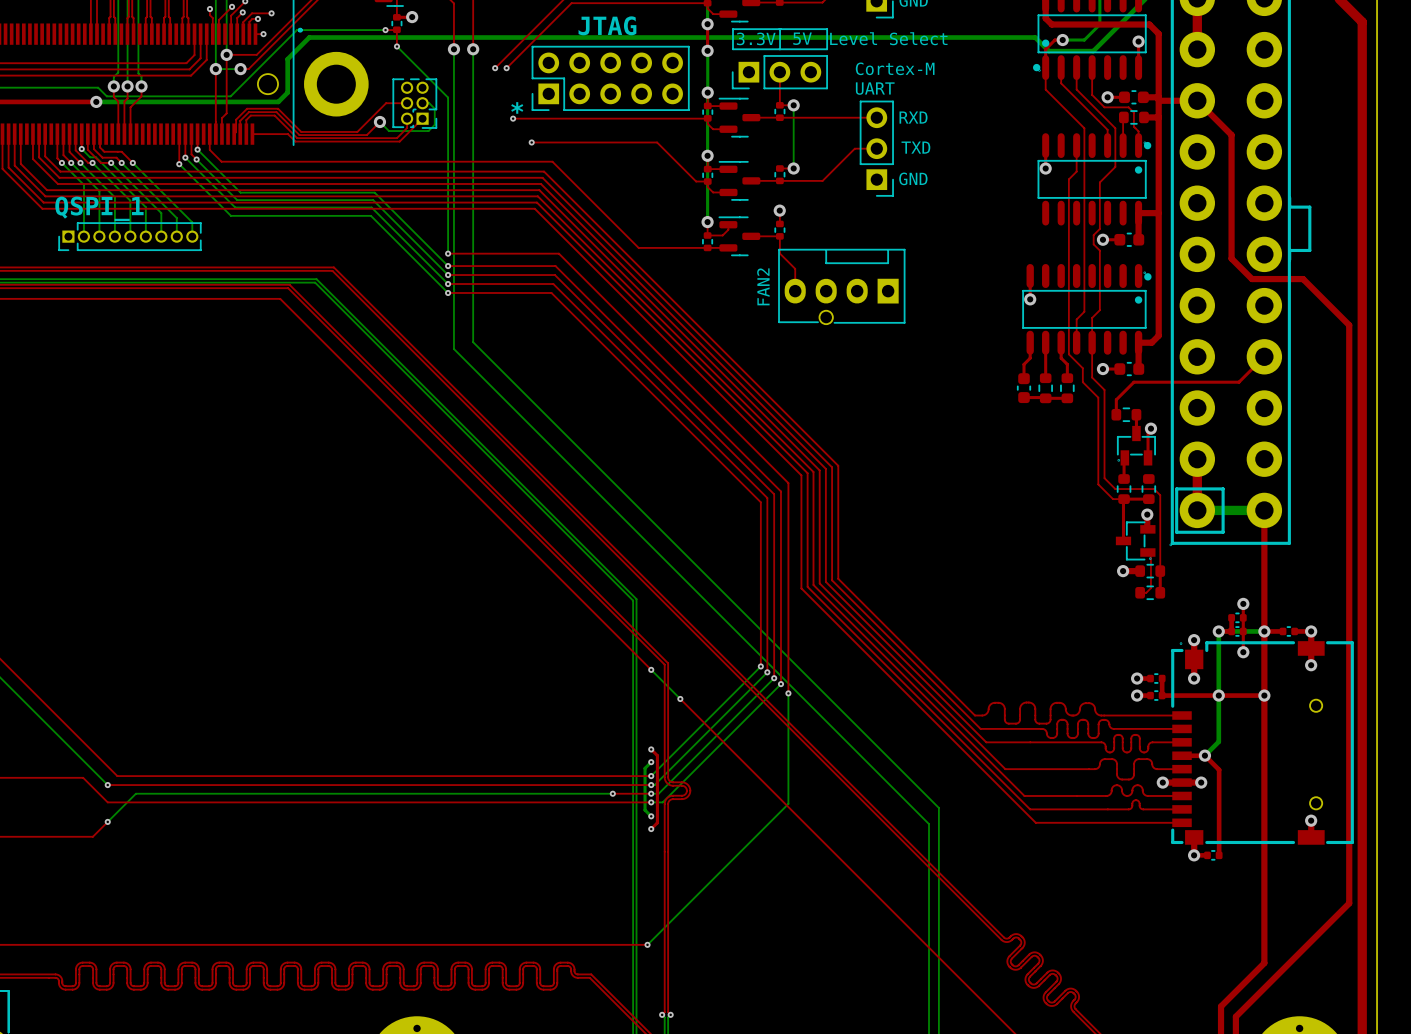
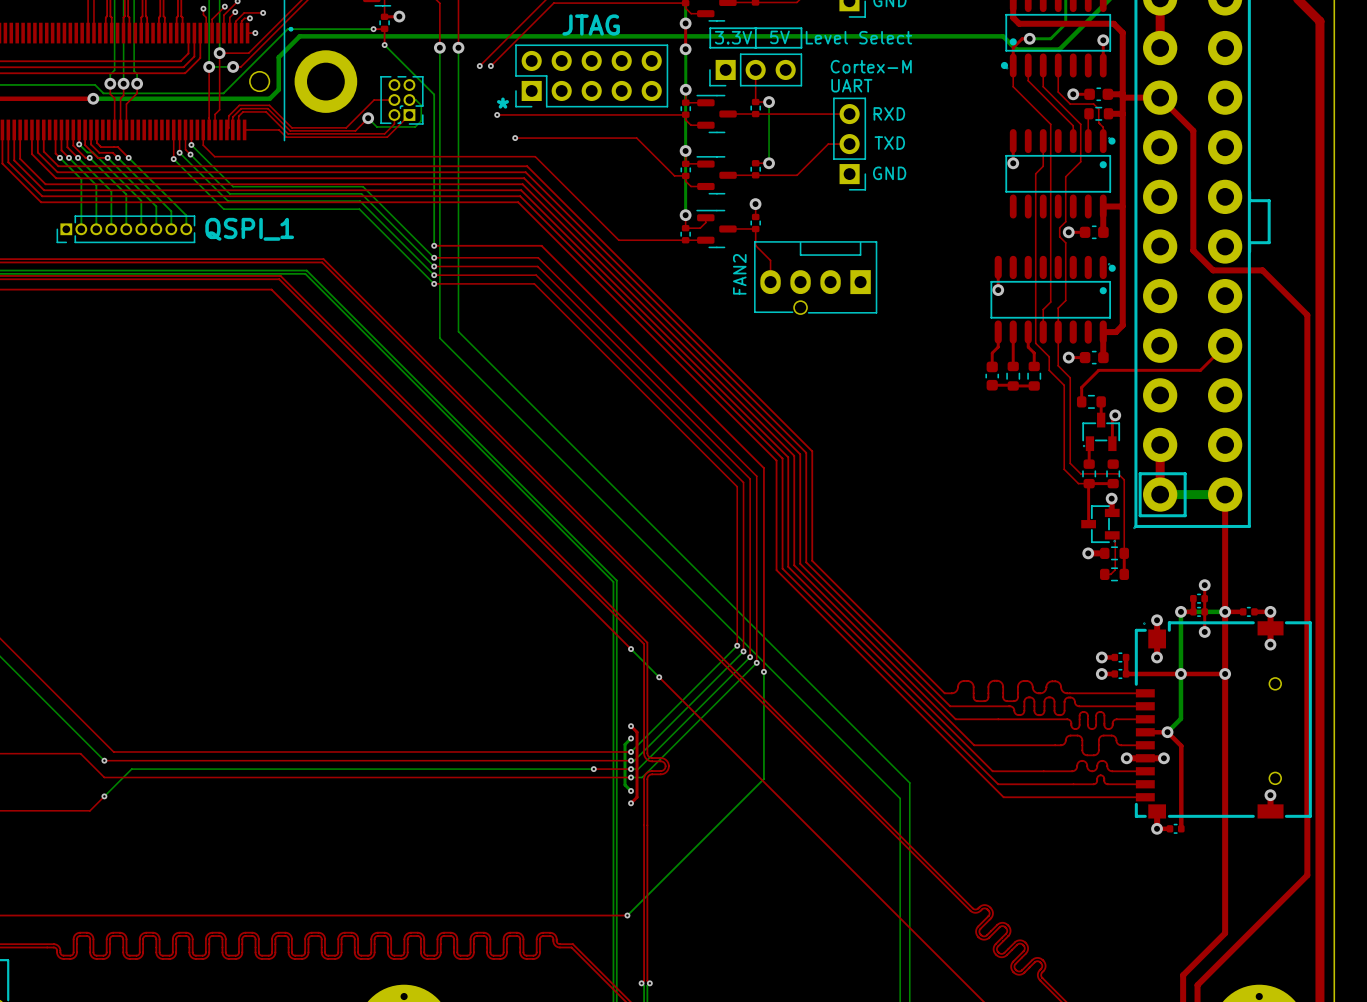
text position: QSPI_1 (99, 208) -> QSPI_1 (249, 229)

